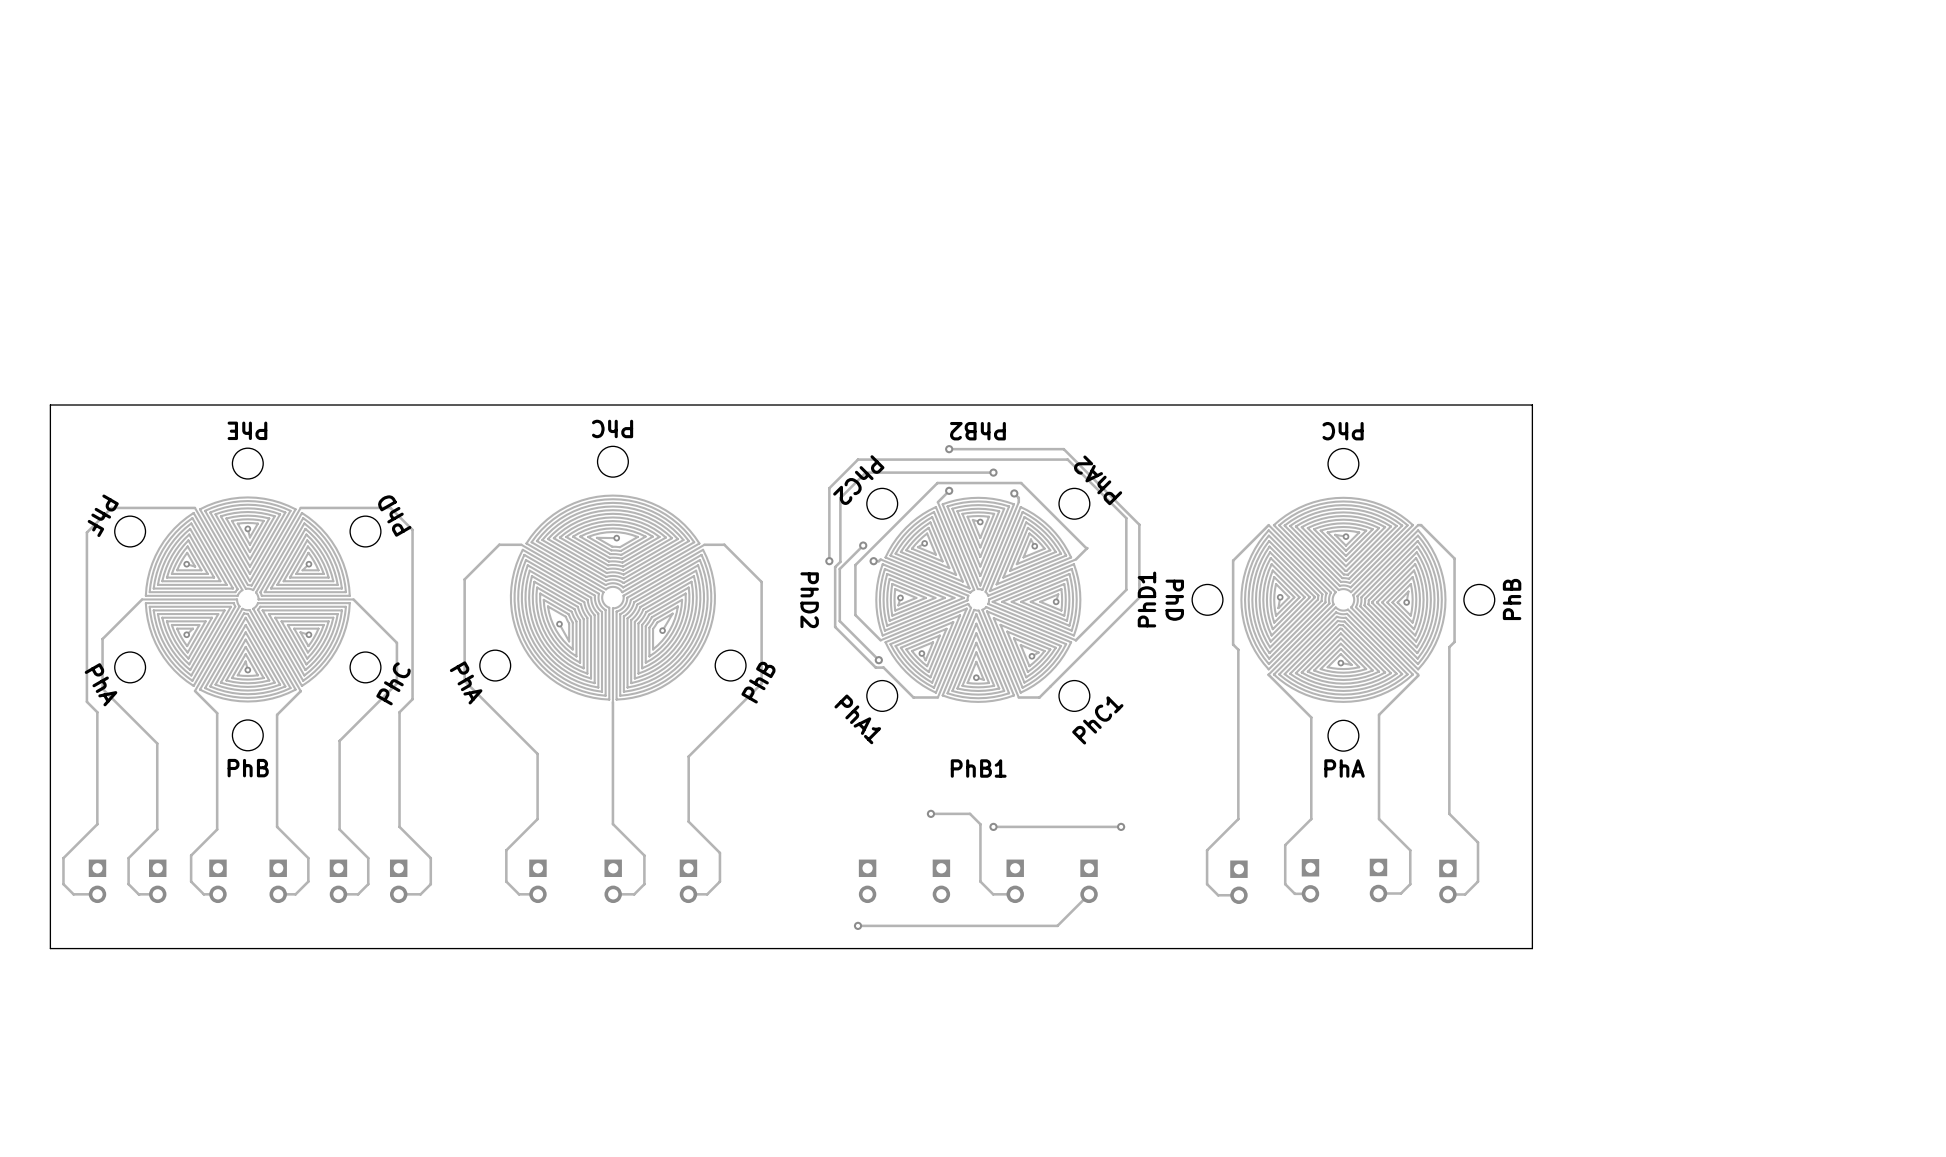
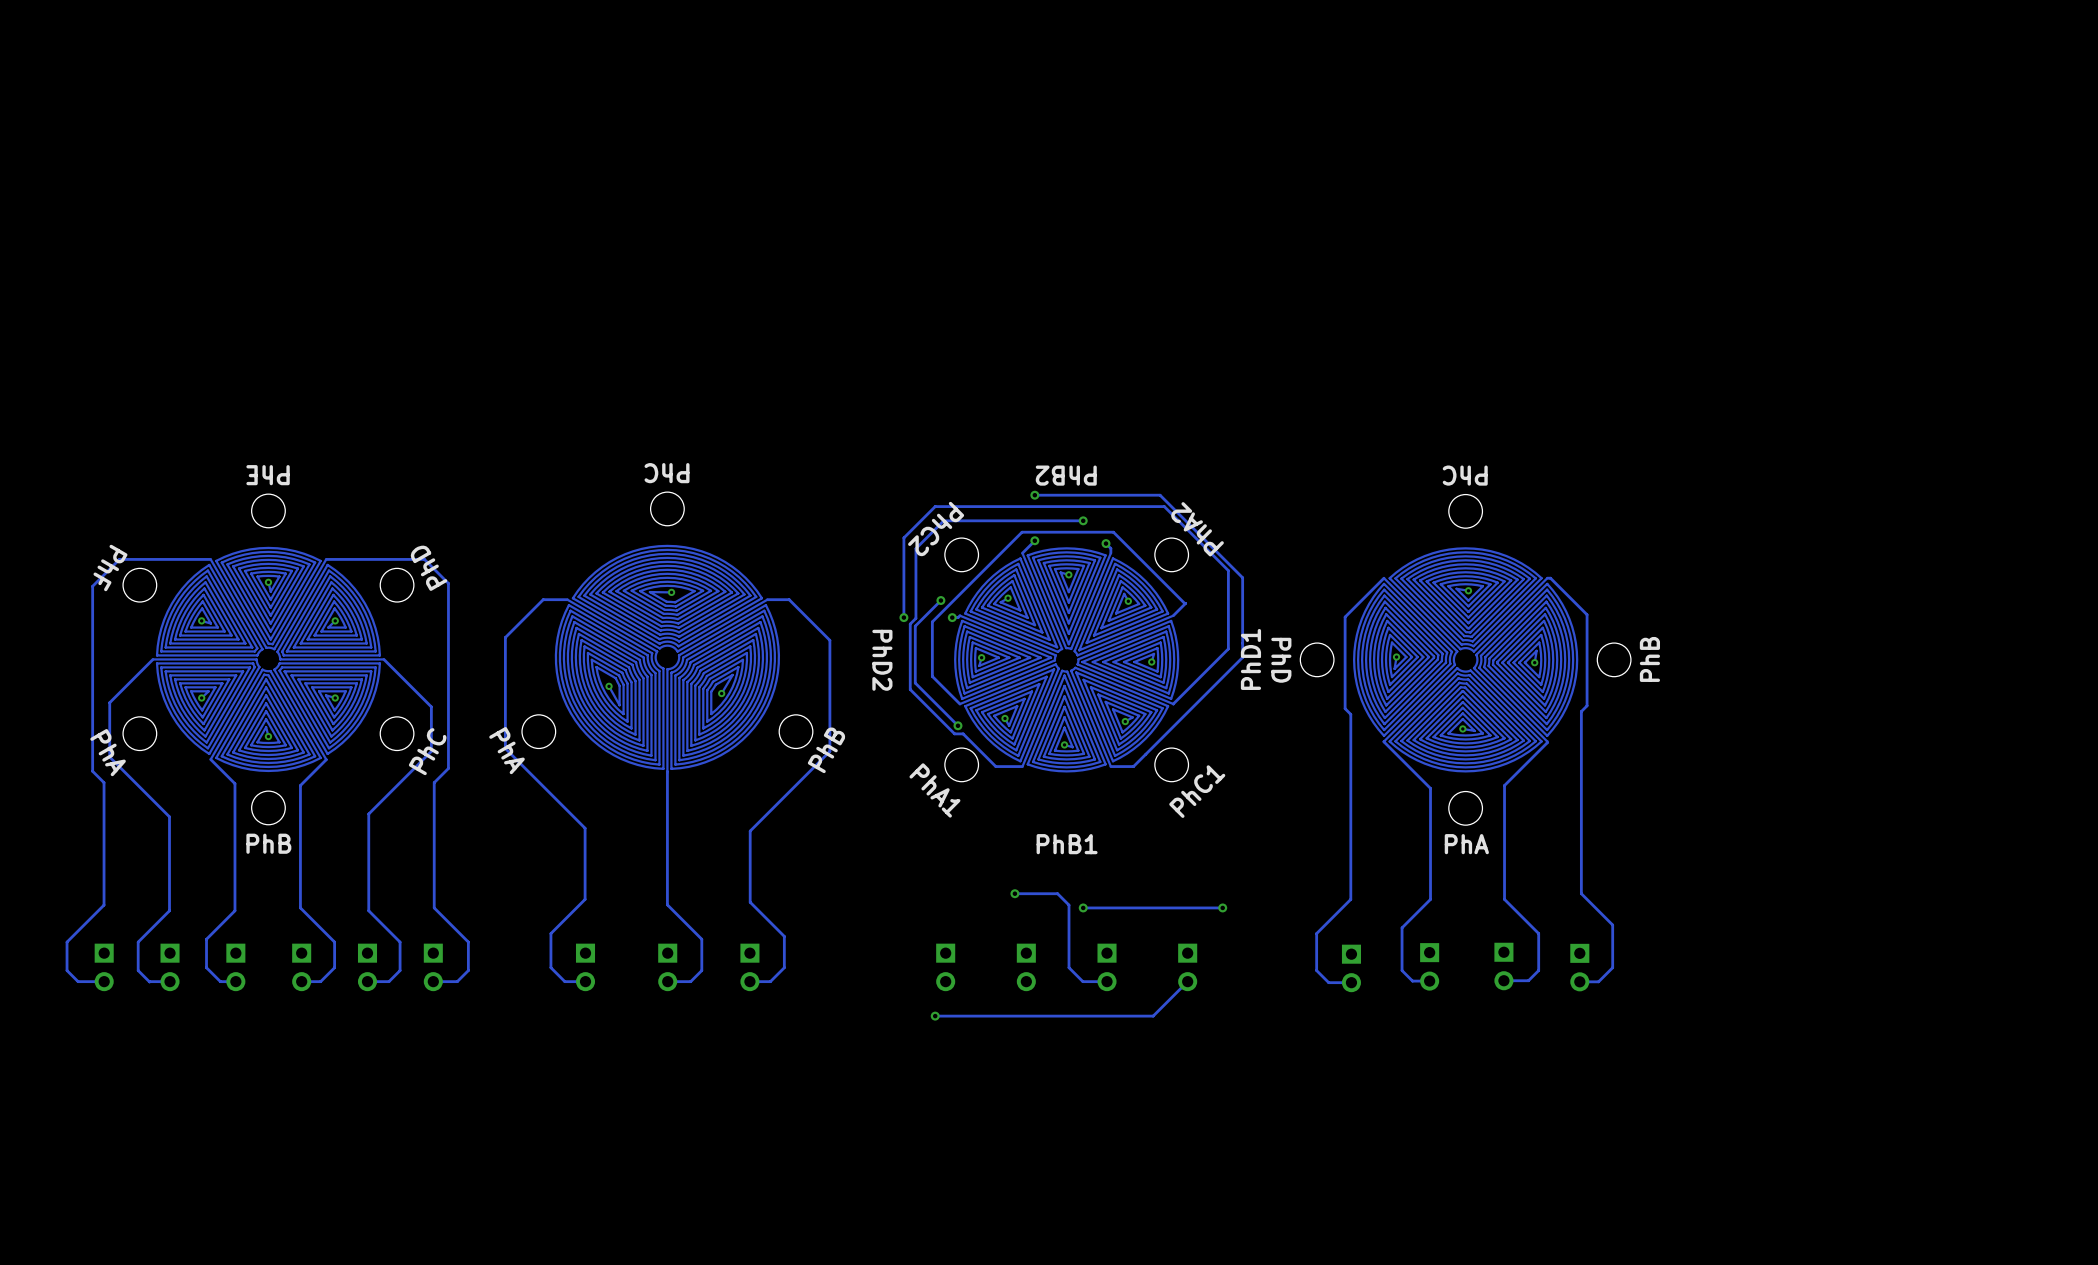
board edge: (1532, 405) (1532, 948) (50, 948) (50, 405) (1532, 405) -> none

